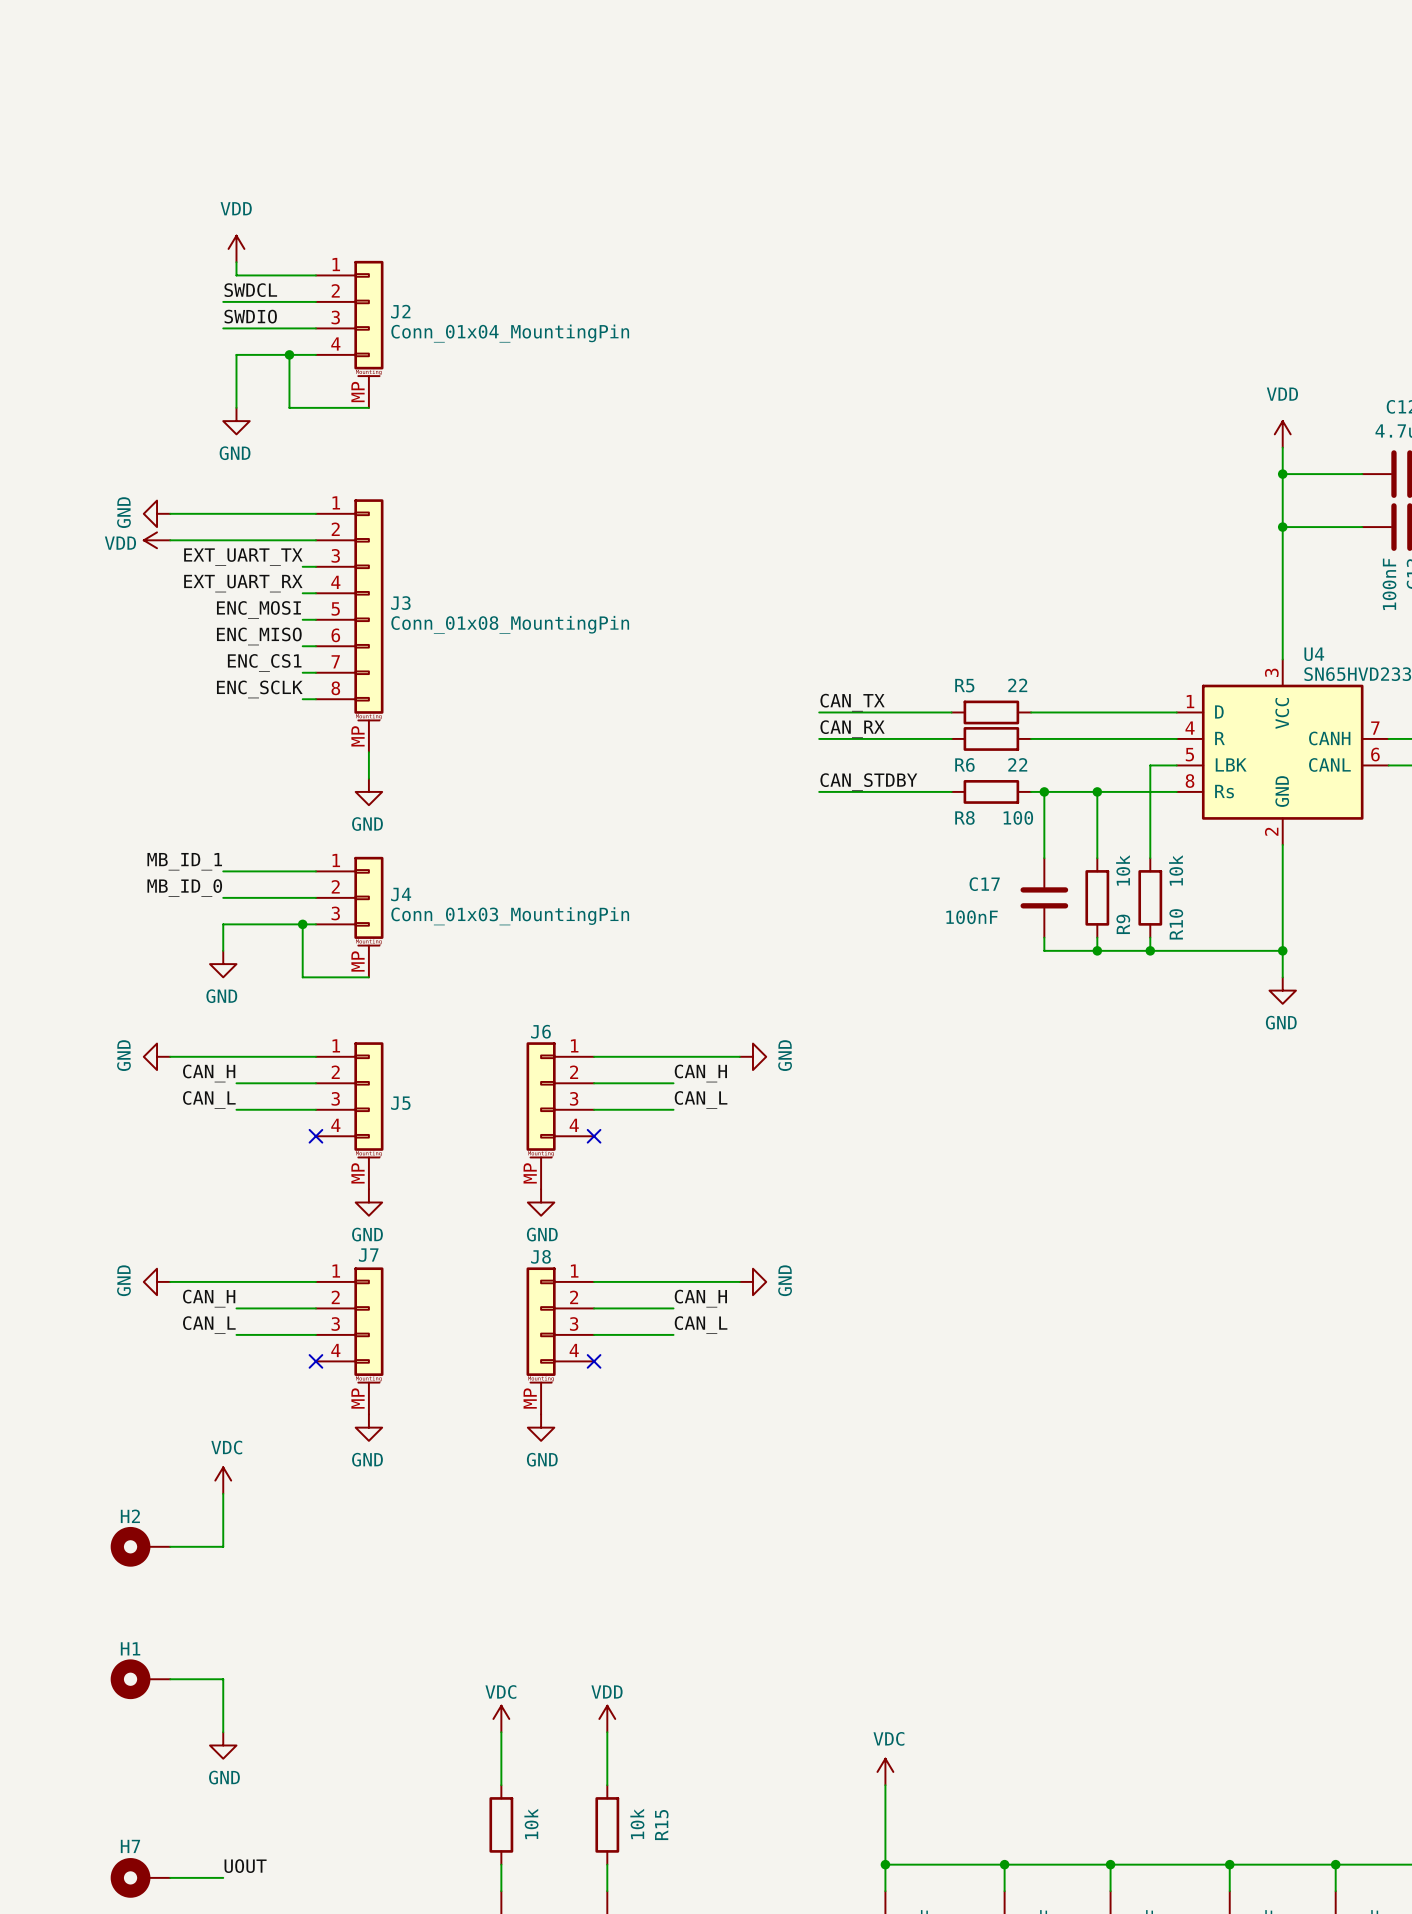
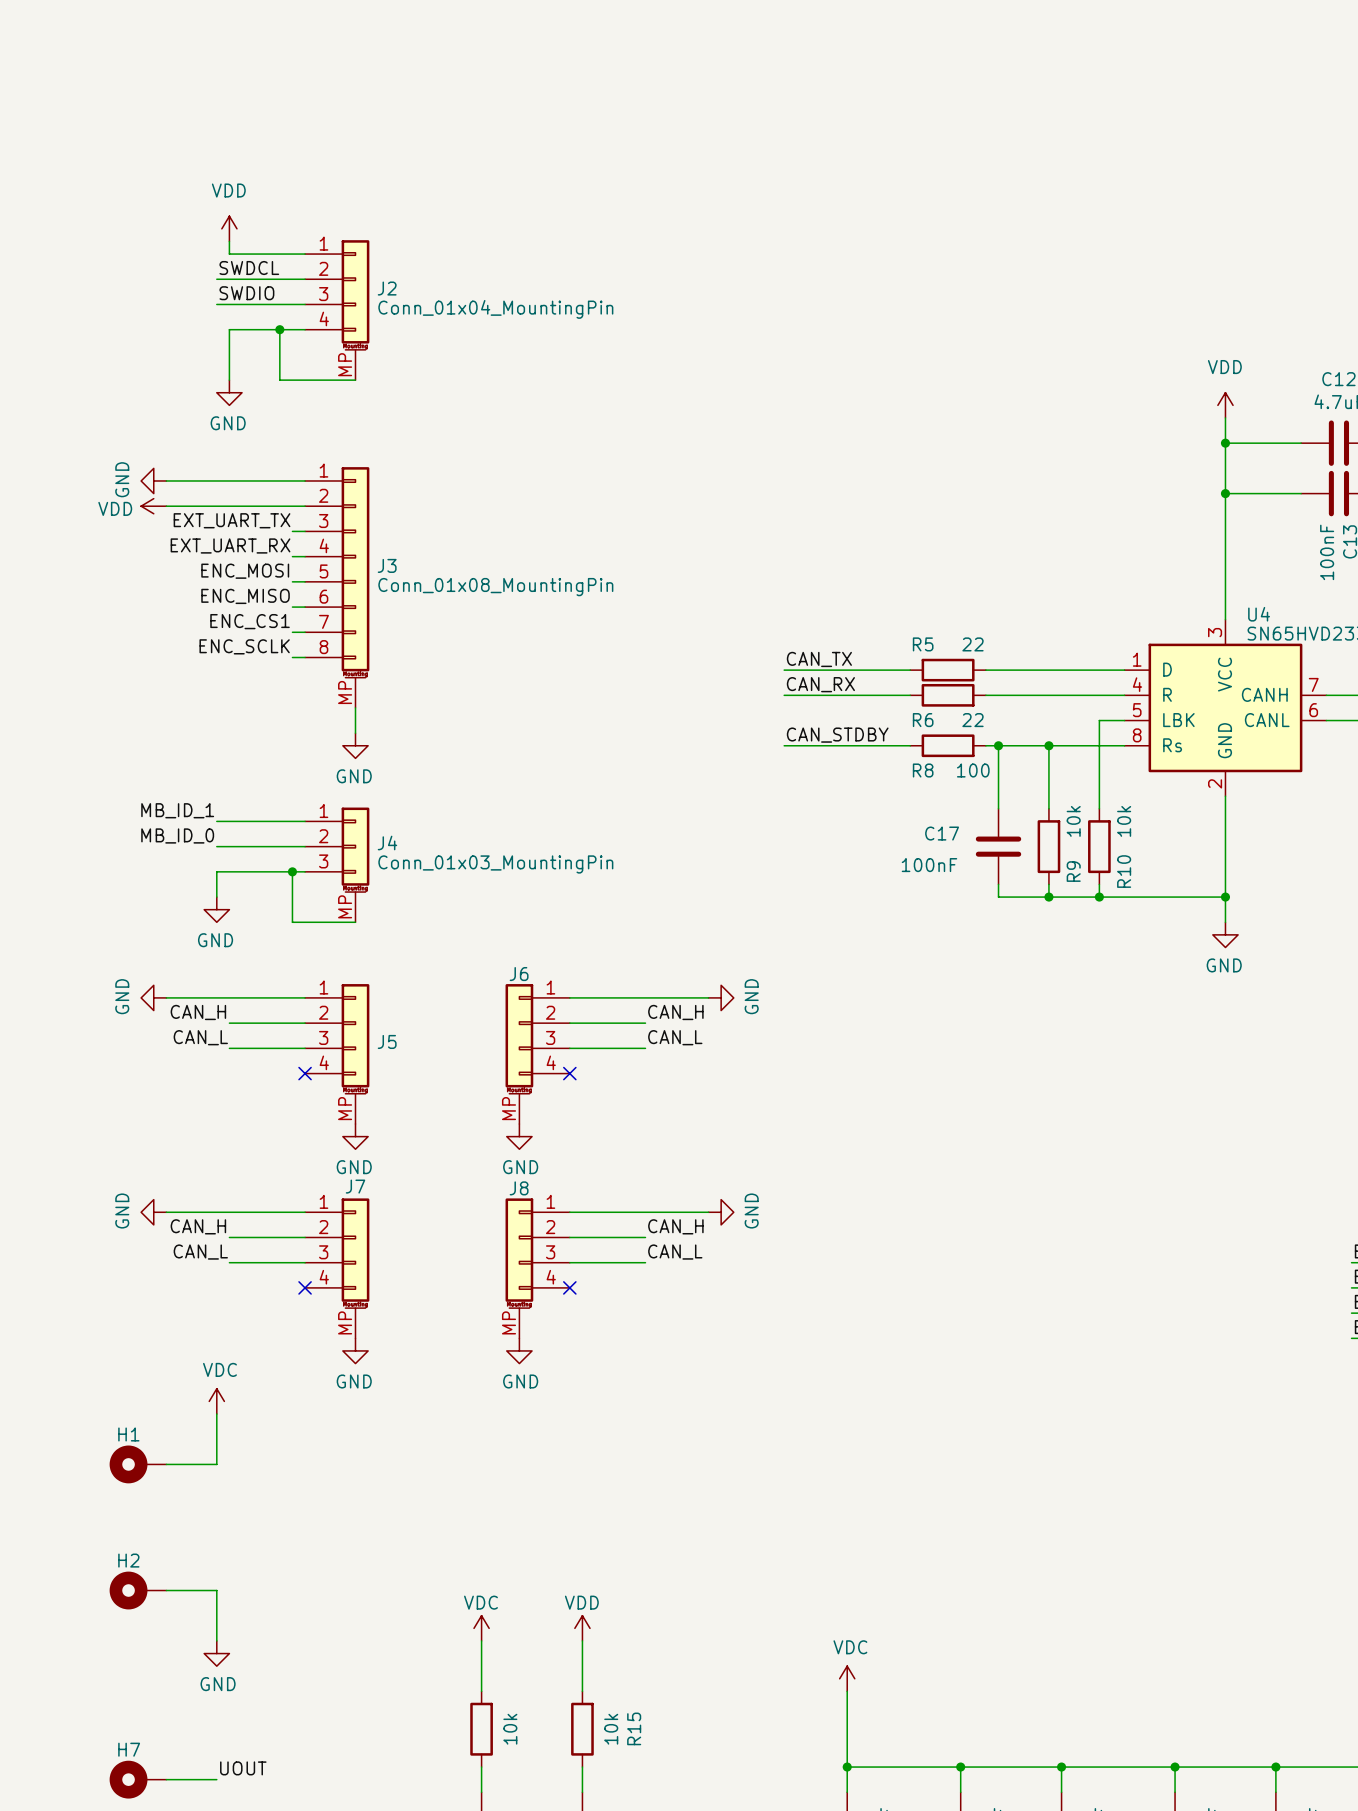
H2 name: H2 (130, 1516) -> H1 (128, 1434)
H1 name: H1 (130, 1648) -> H2 (128, 1560)

